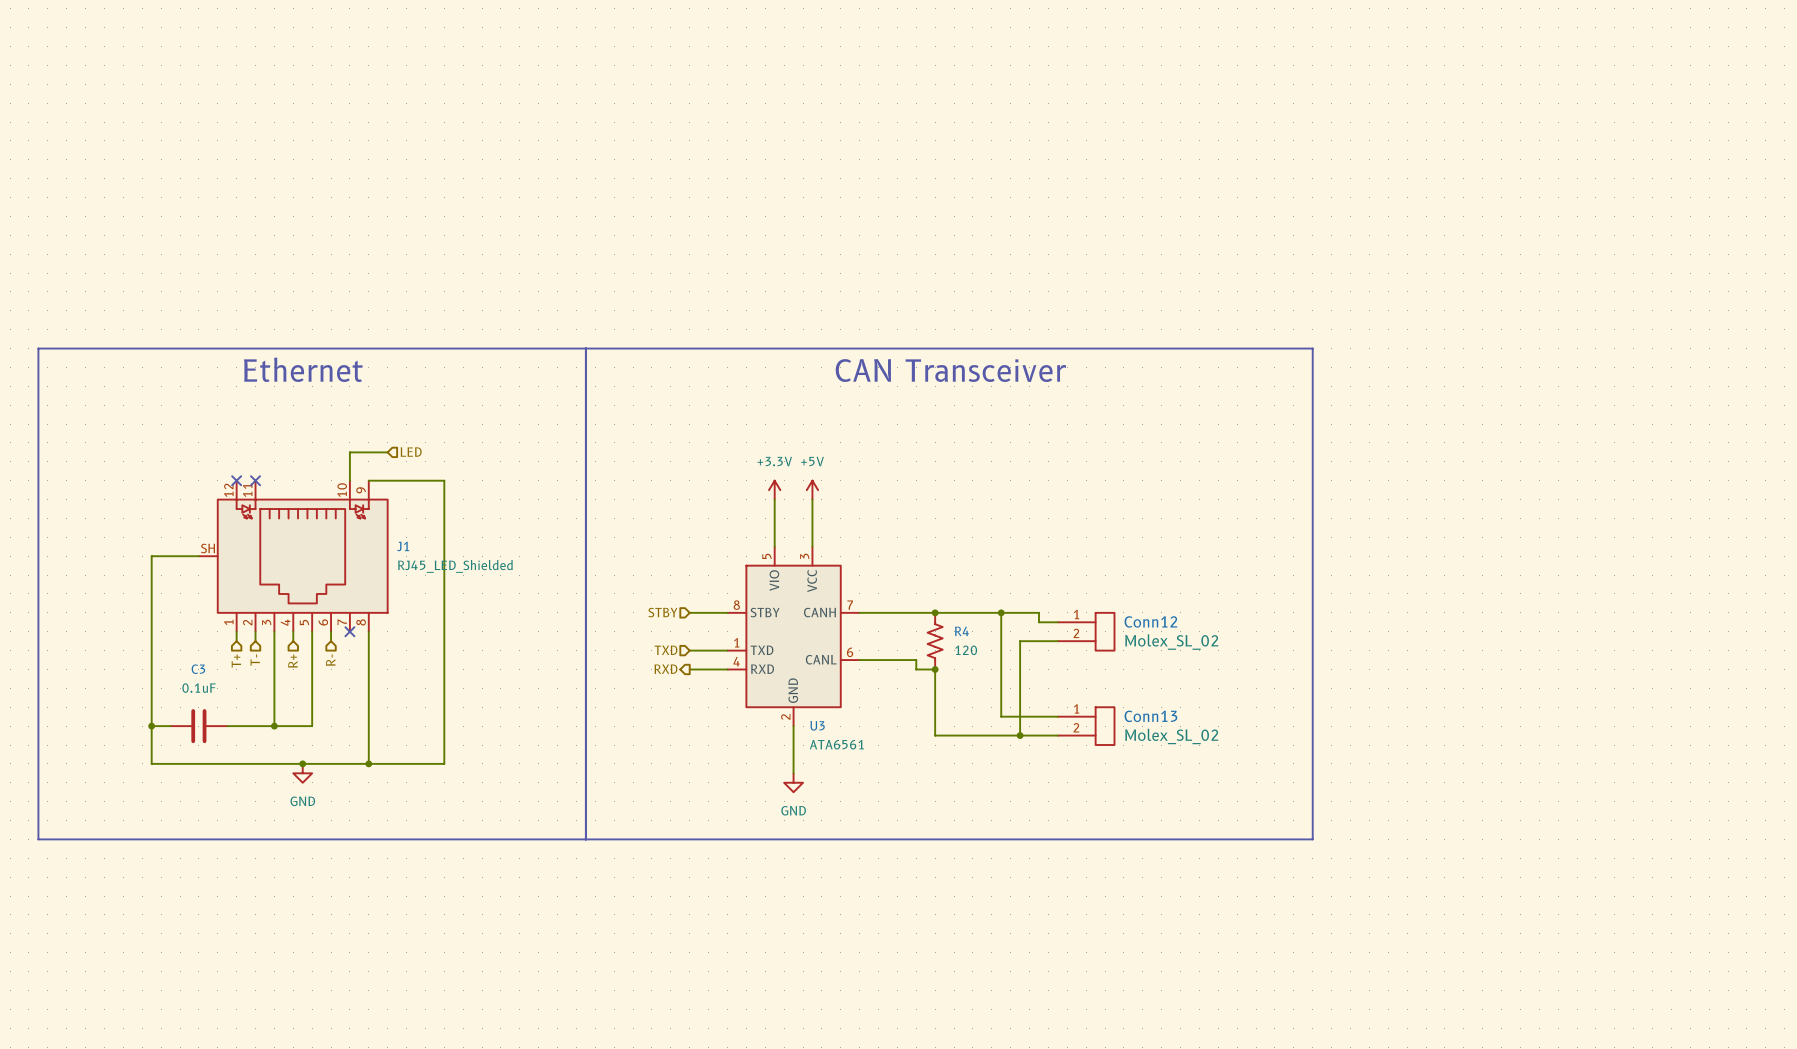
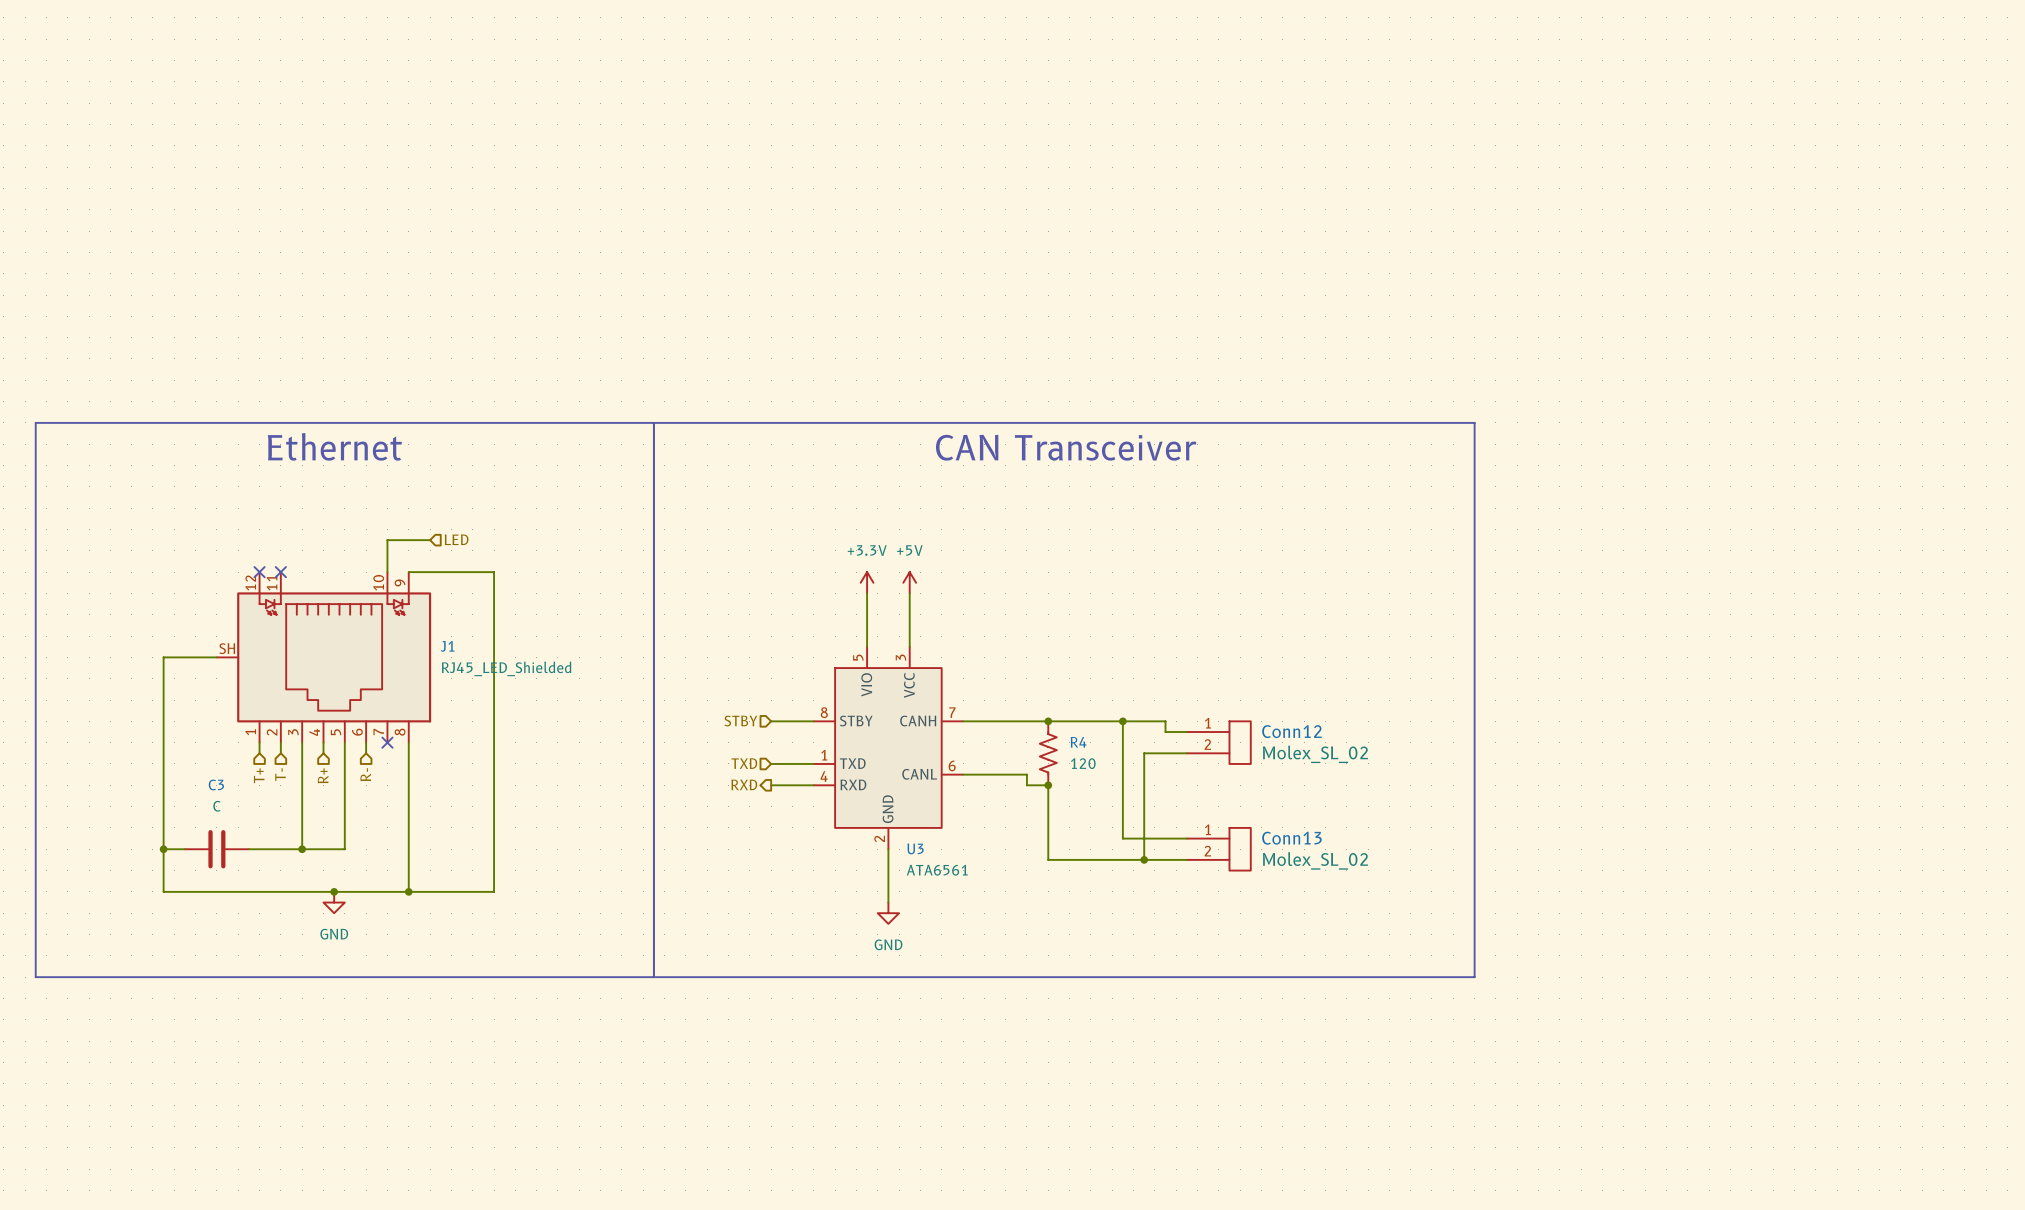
C3 value: 0.1uF (198, 688) -> C (216, 806)

